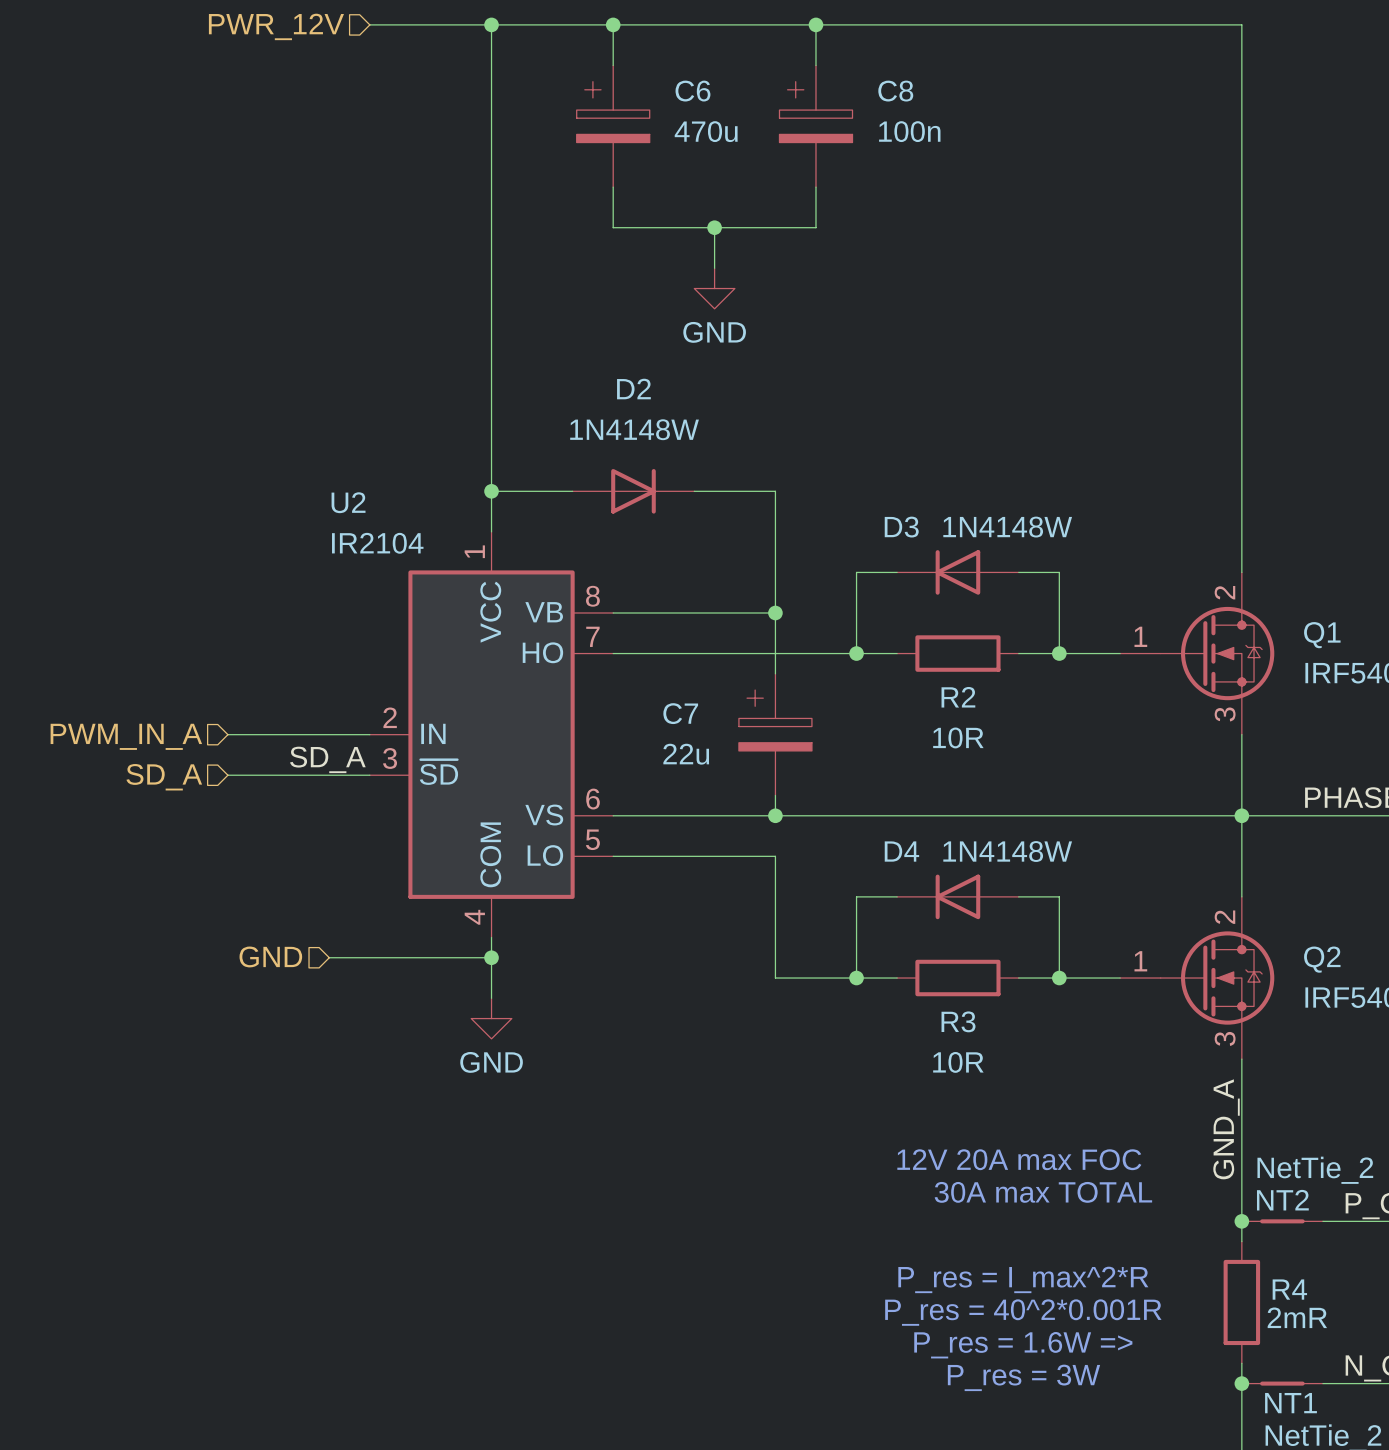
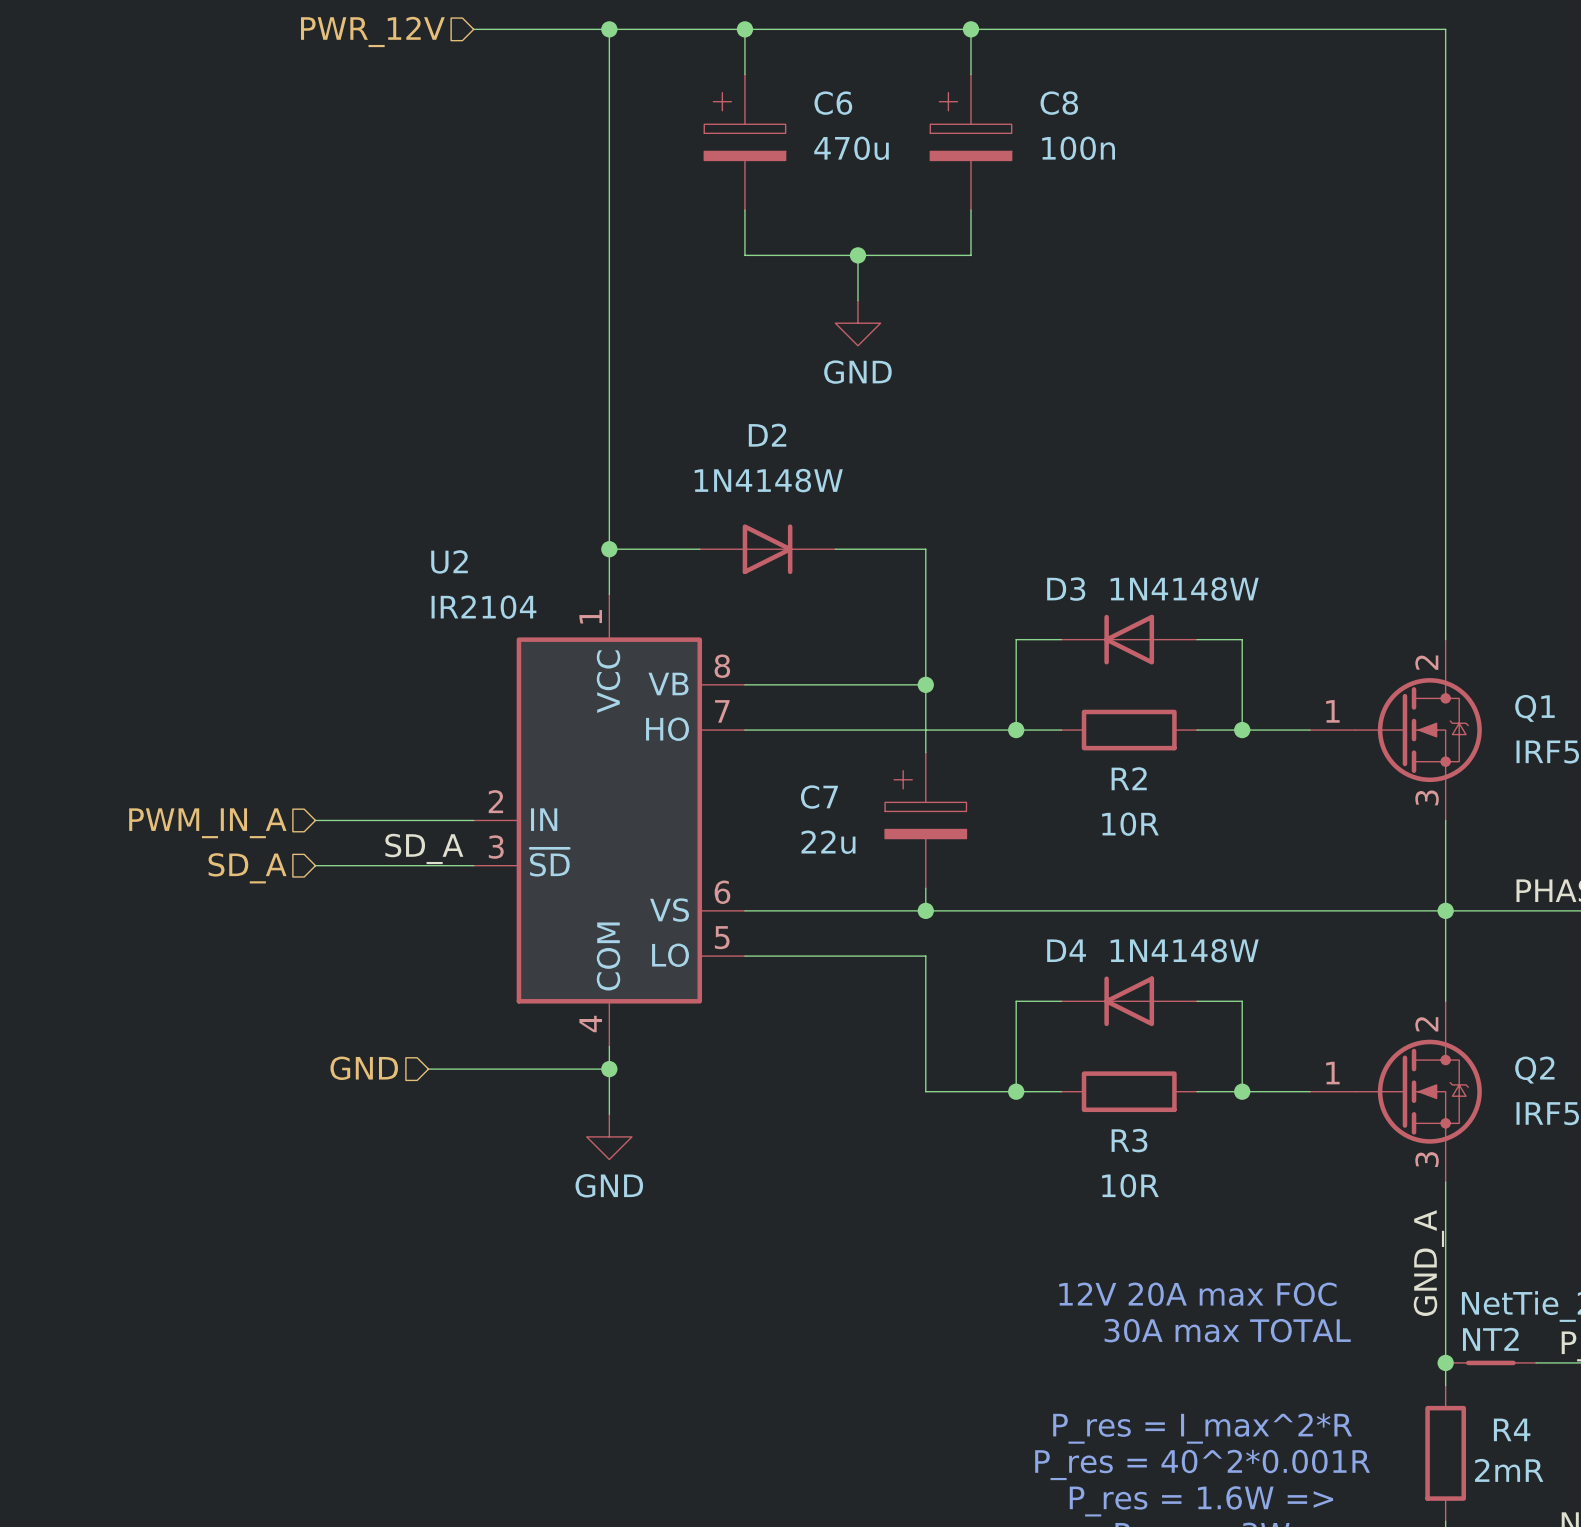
R4 name position: R4 (1289, 1289) -> R4 (1512, 1429)

